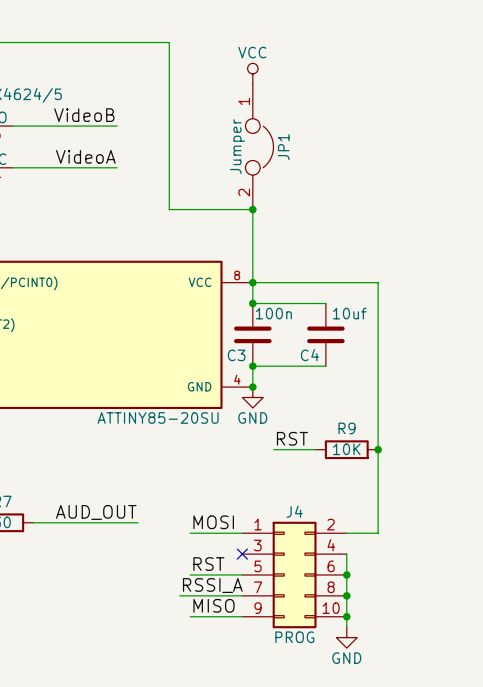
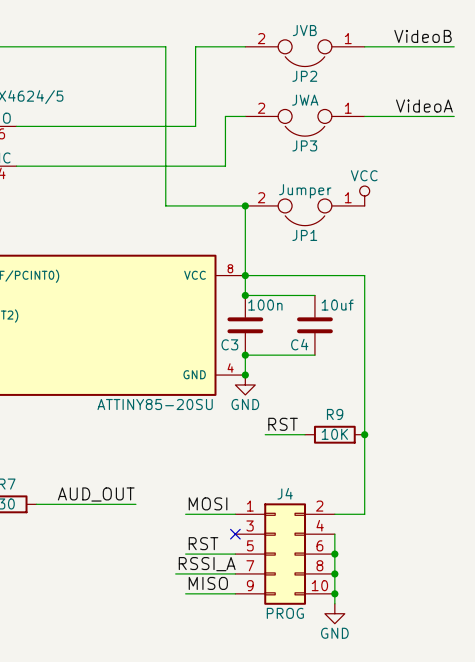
label: none -> VideoB (423, 36)
wire: none -> (245, 46) (195, 46) (195, 126) (116, 126)
wire: none -> (364, 46) (454, 46)
JP2: none -> JVB (305, 53)
power symbol position: VCC (252, 73) -> VCC (364, 196)
label: none -> VideoA (424, 106)
label: VideoB (84, 115) -> none
wire: none -> (245, 116) (225, 116) (225, 166) (116, 166)
wire: none -> (364, 116) (454, 116)
JP3: none -> JWA (305, 122)
JP1 rotation: 0° (259, 146) -> 90° clockwise (305, 212)
JP1 position: (259, 146) -> (305, 212)
label: VideoA (85, 156) -> none

